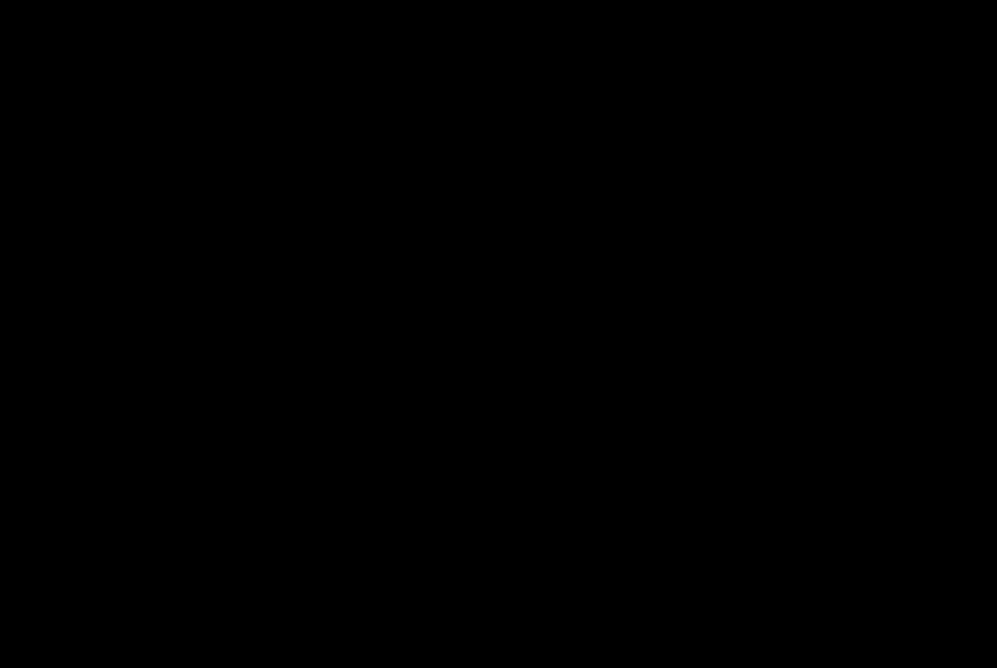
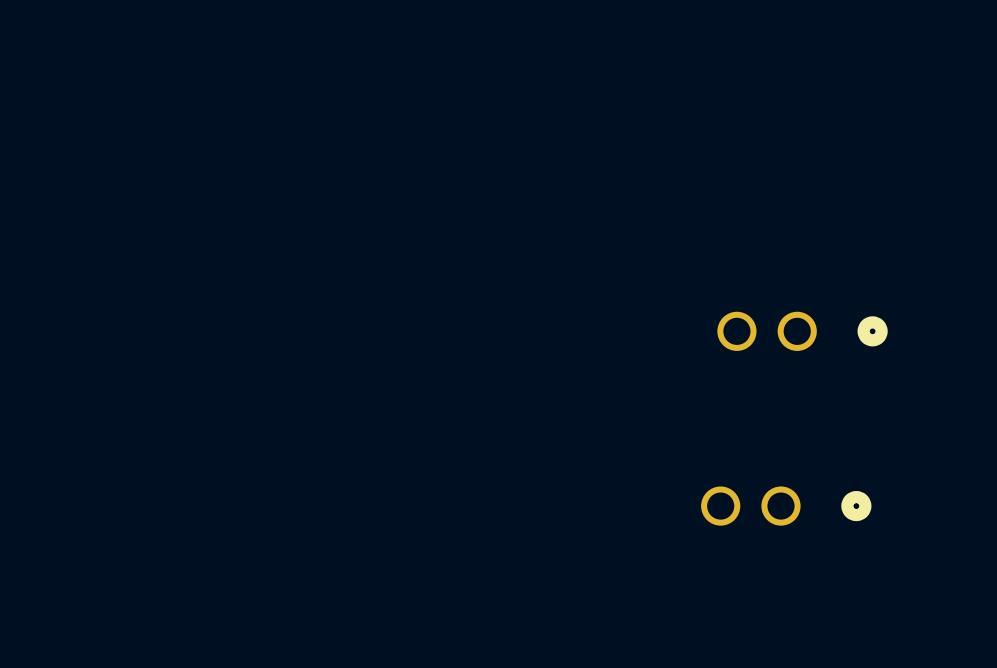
part: none -> (802, 331)
part: none -> (786, 506)

